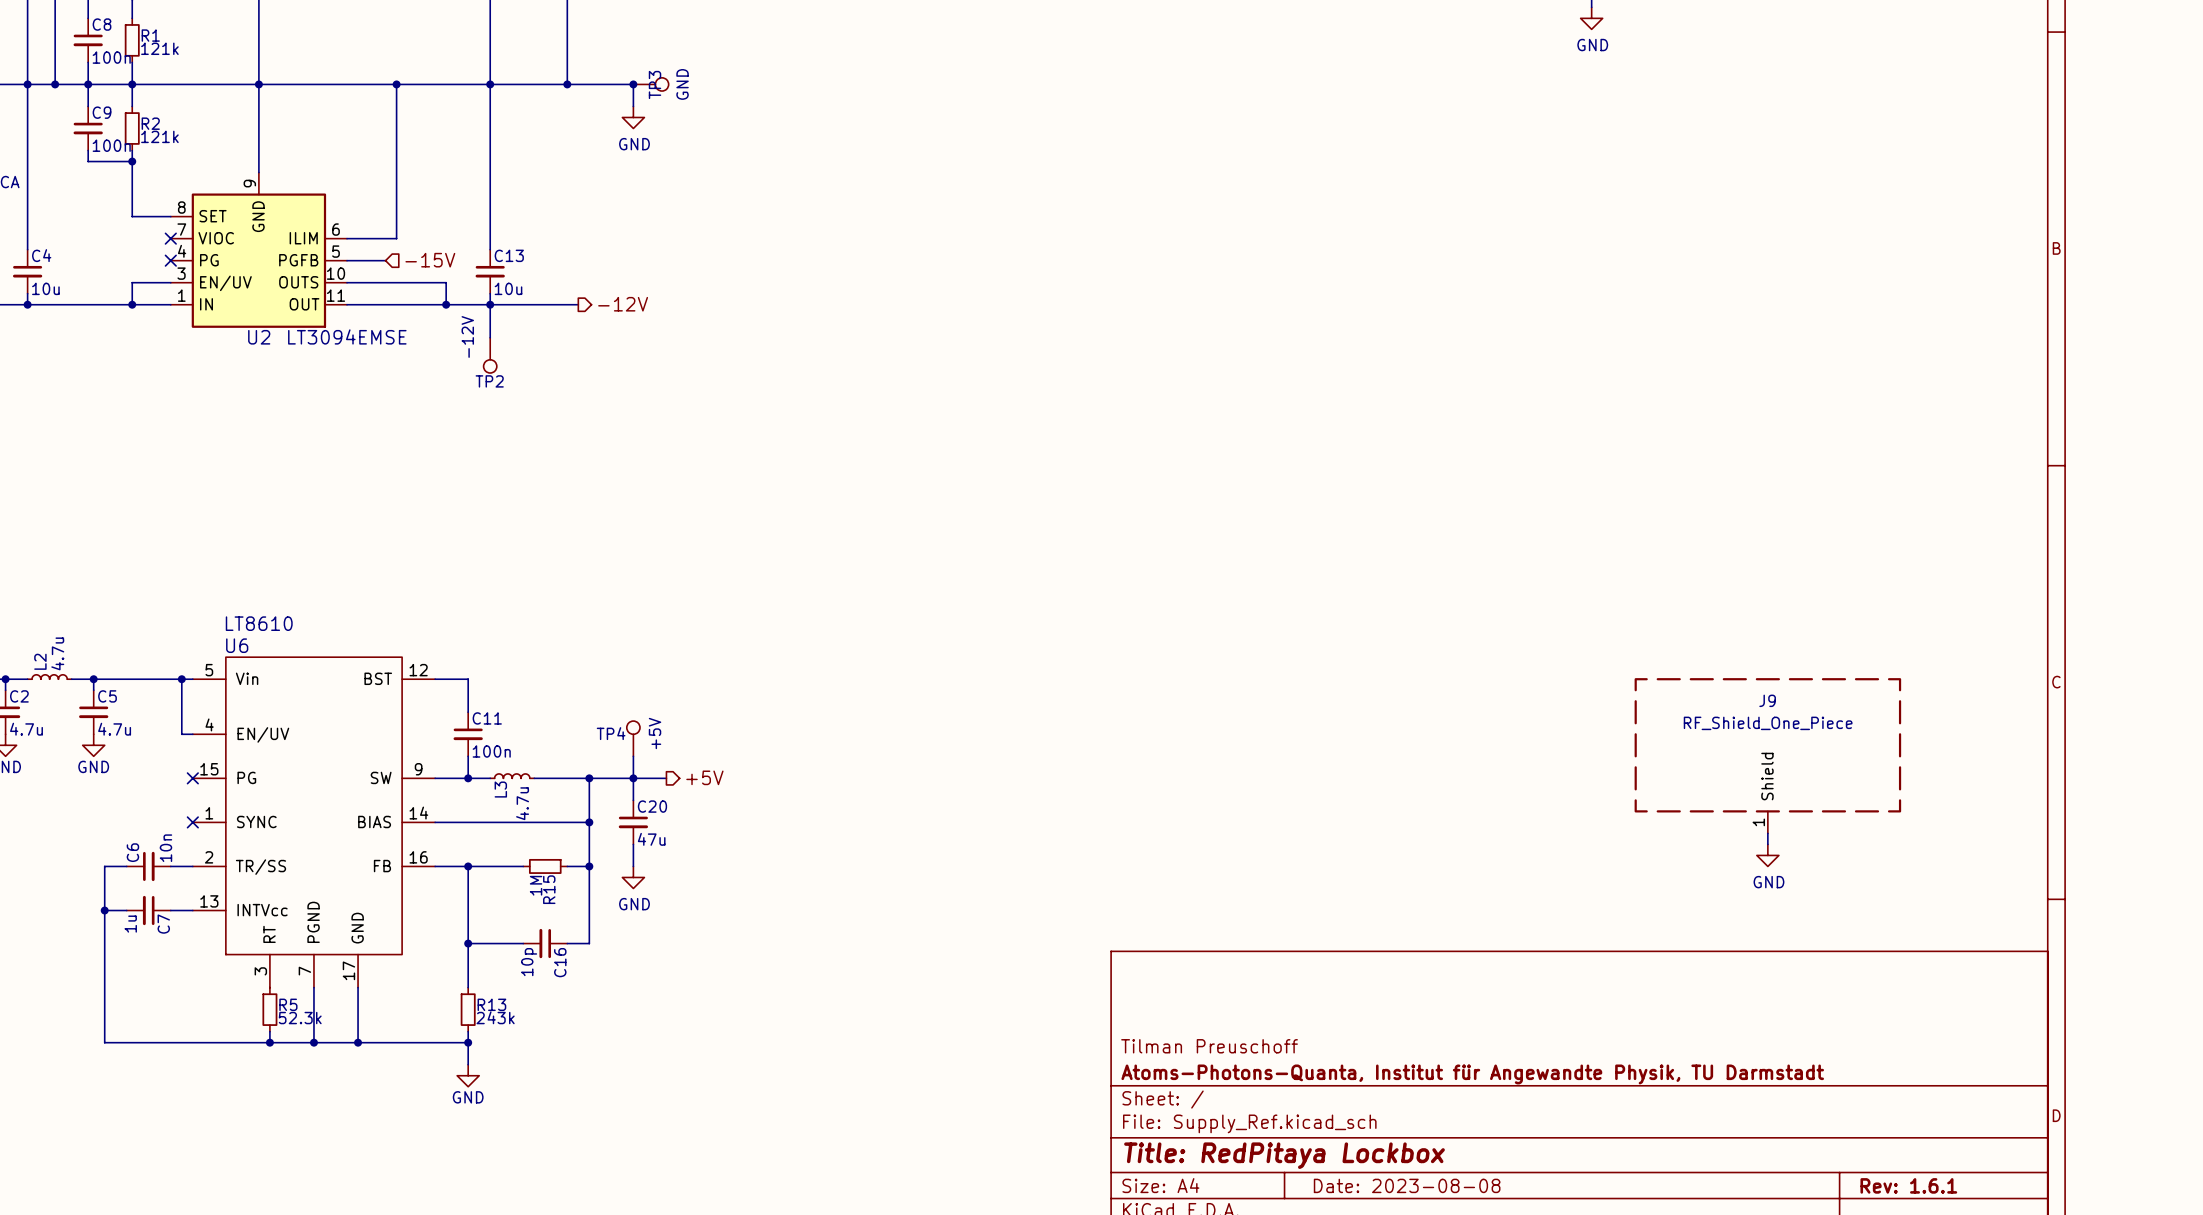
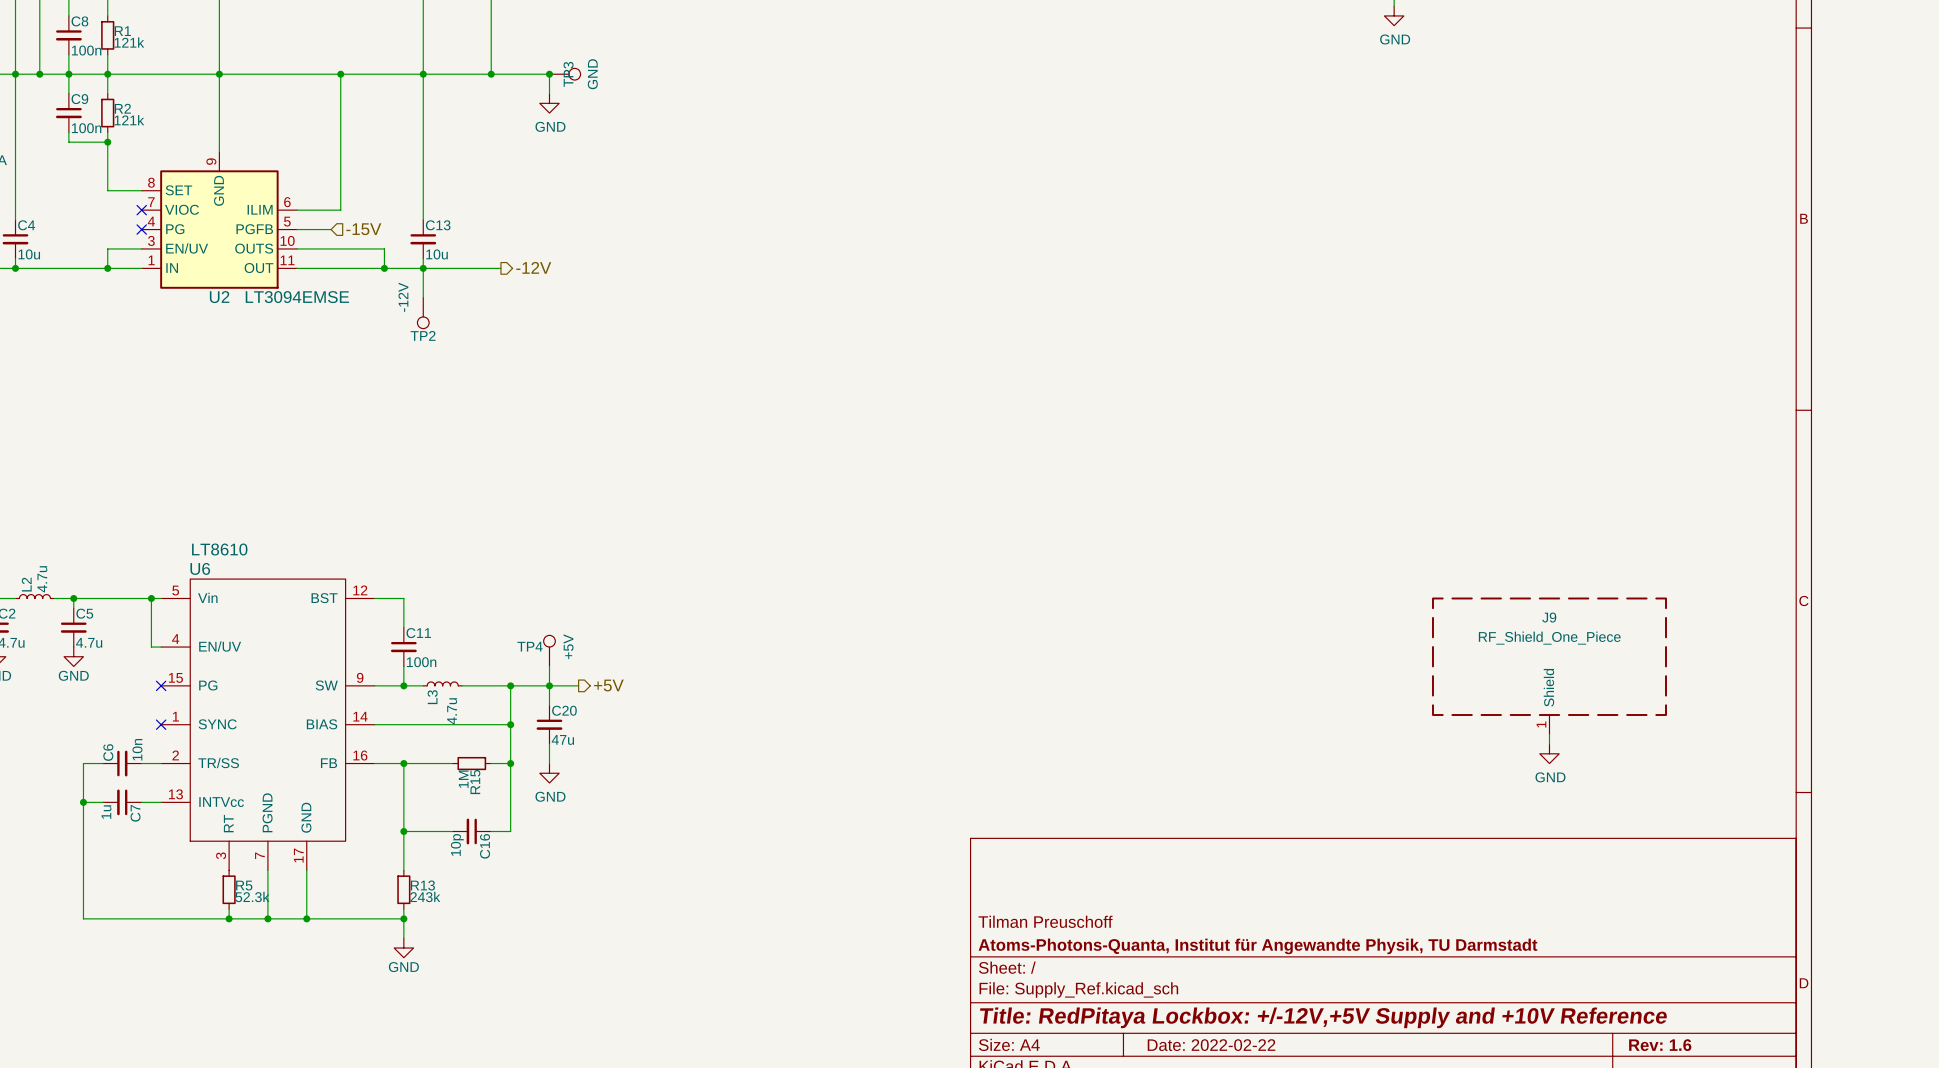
title block: Title: RedPitaya Lockbox (1284, 1155) -> Title: RedPitaya Lockbox: +/-12V,+5V Supply and +10V Reference (1323, 1017)
title block: Date: 2023-08-08 (1407, 1185) -> Date: 2022-02-22 (1211, 1045)
title block: Rev: 1.6.1 (1908, 1185) -> Rev: 1.6 (1660, 1045)

